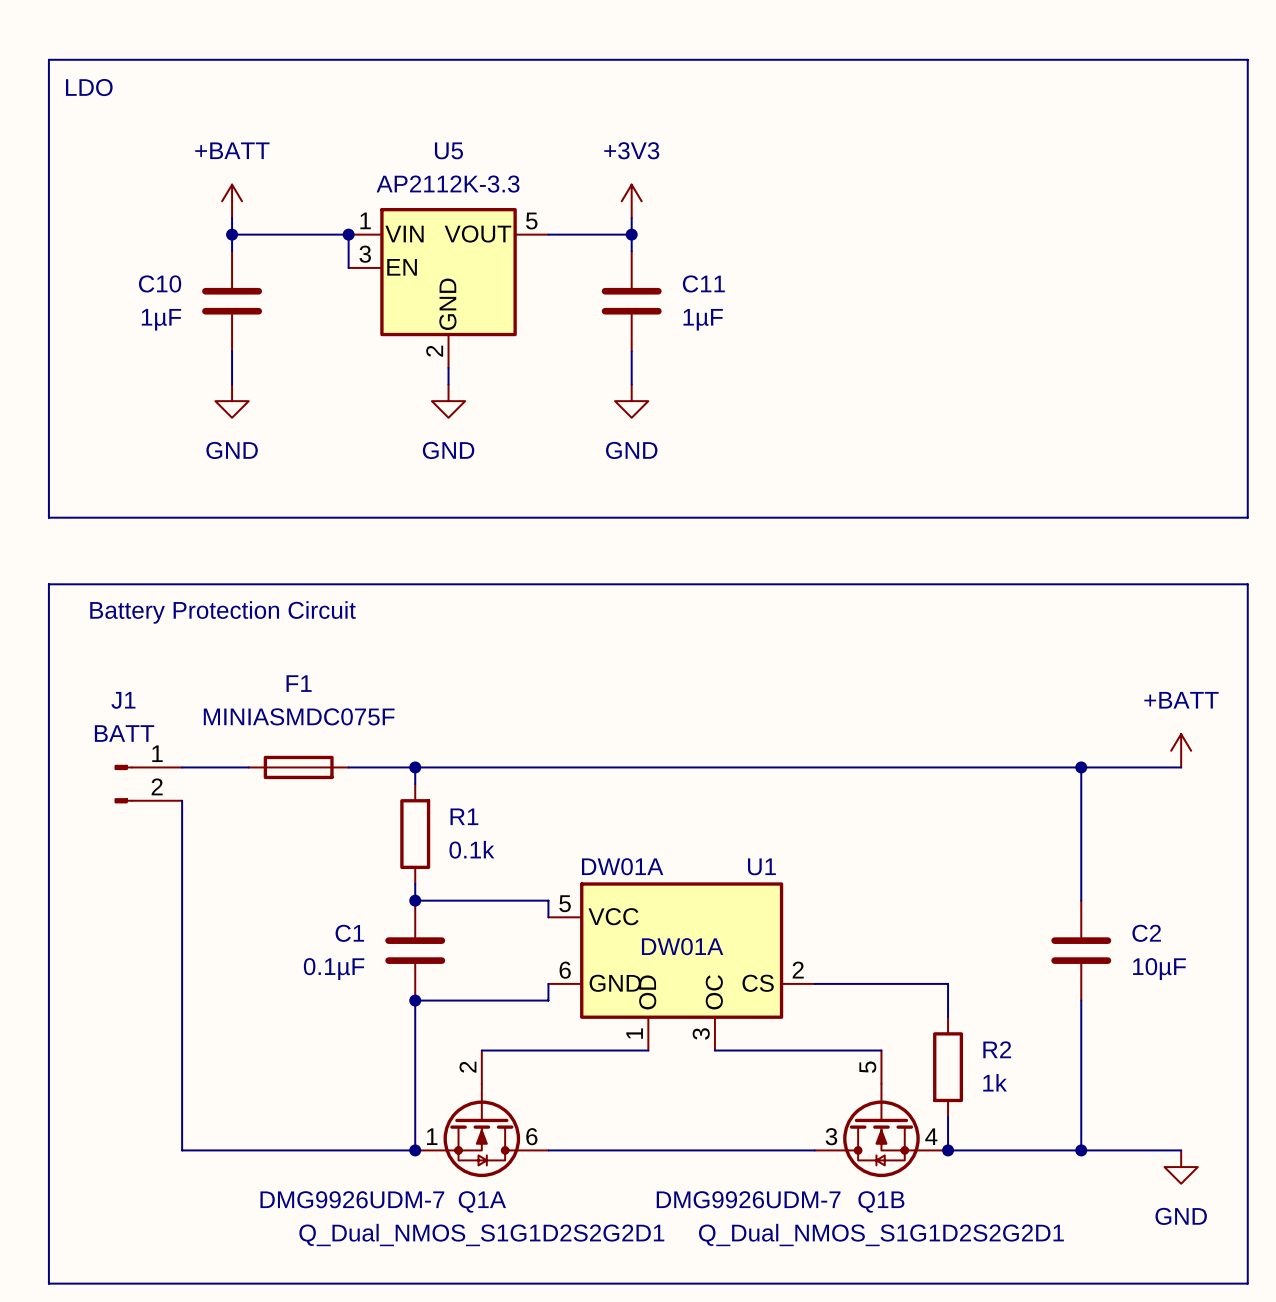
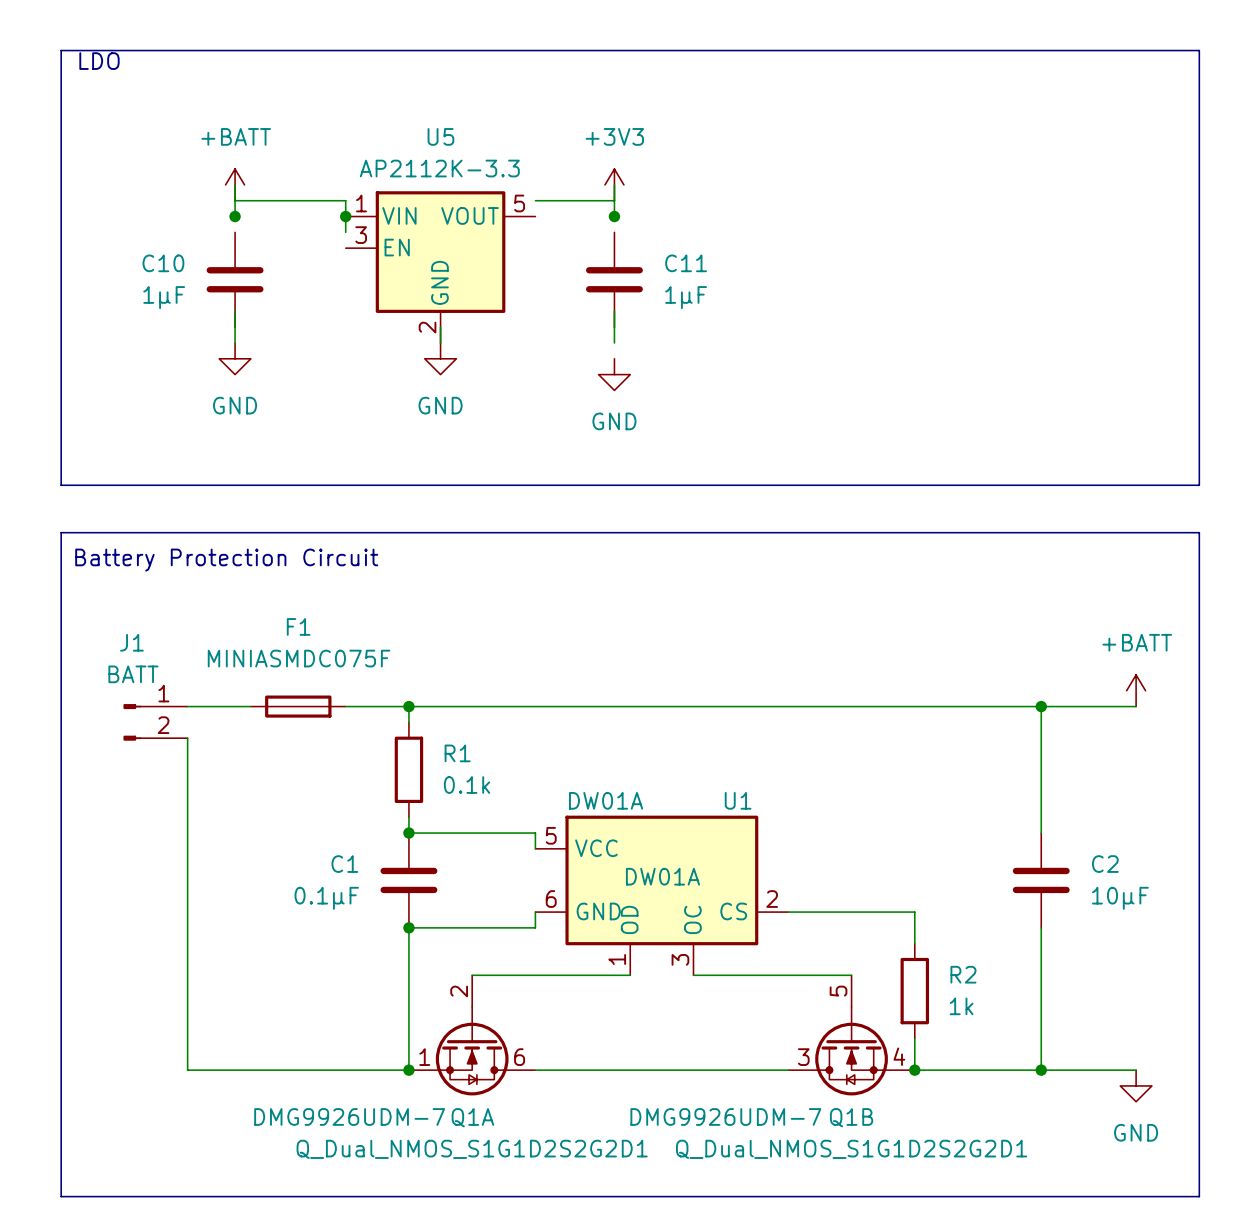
line: (48, 76) (48, 59) (1247, 59) (1247, 76) -> (61, 50) (1199, 50)
power symbol position: +BATT (232, 201) -> +BATT (235, 184)
power symbol position: +3V3 (631, 201) -> +3V3 (614, 184)
junction position: (232, 234) -> (235, 216)
junction position: (348, 234) -> (345, 216)
junction position: (631, 234) -> (614, 216)
U5 position: (448, 287) -> (440, 267)
C10 position: (232, 301) -> (235, 279)
C11 position: (631, 301) -> (614, 279)
power symbol position: GND (631, 401) -> GND (614, 374)
line: (48, 517) (1247, 517) -> (61, 469) (61, 485) (1199, 485) (1199, 469)

